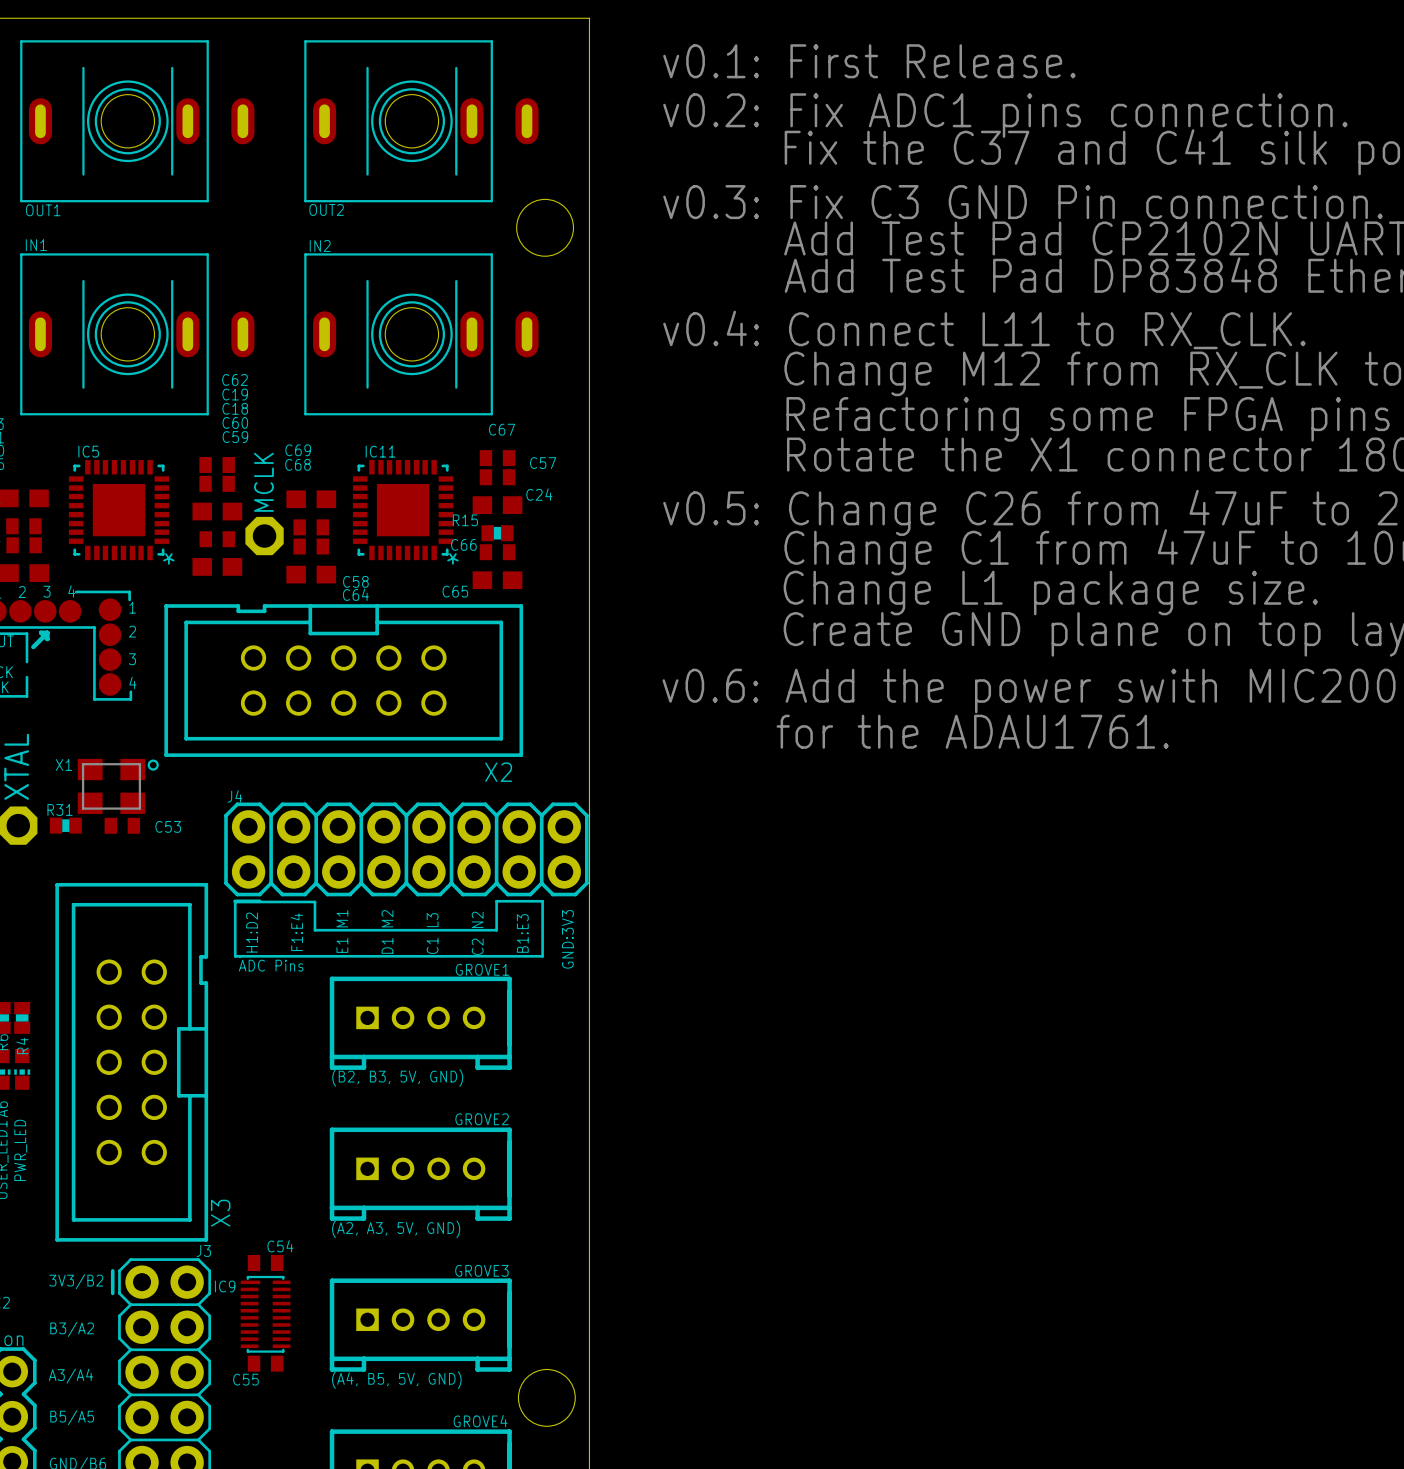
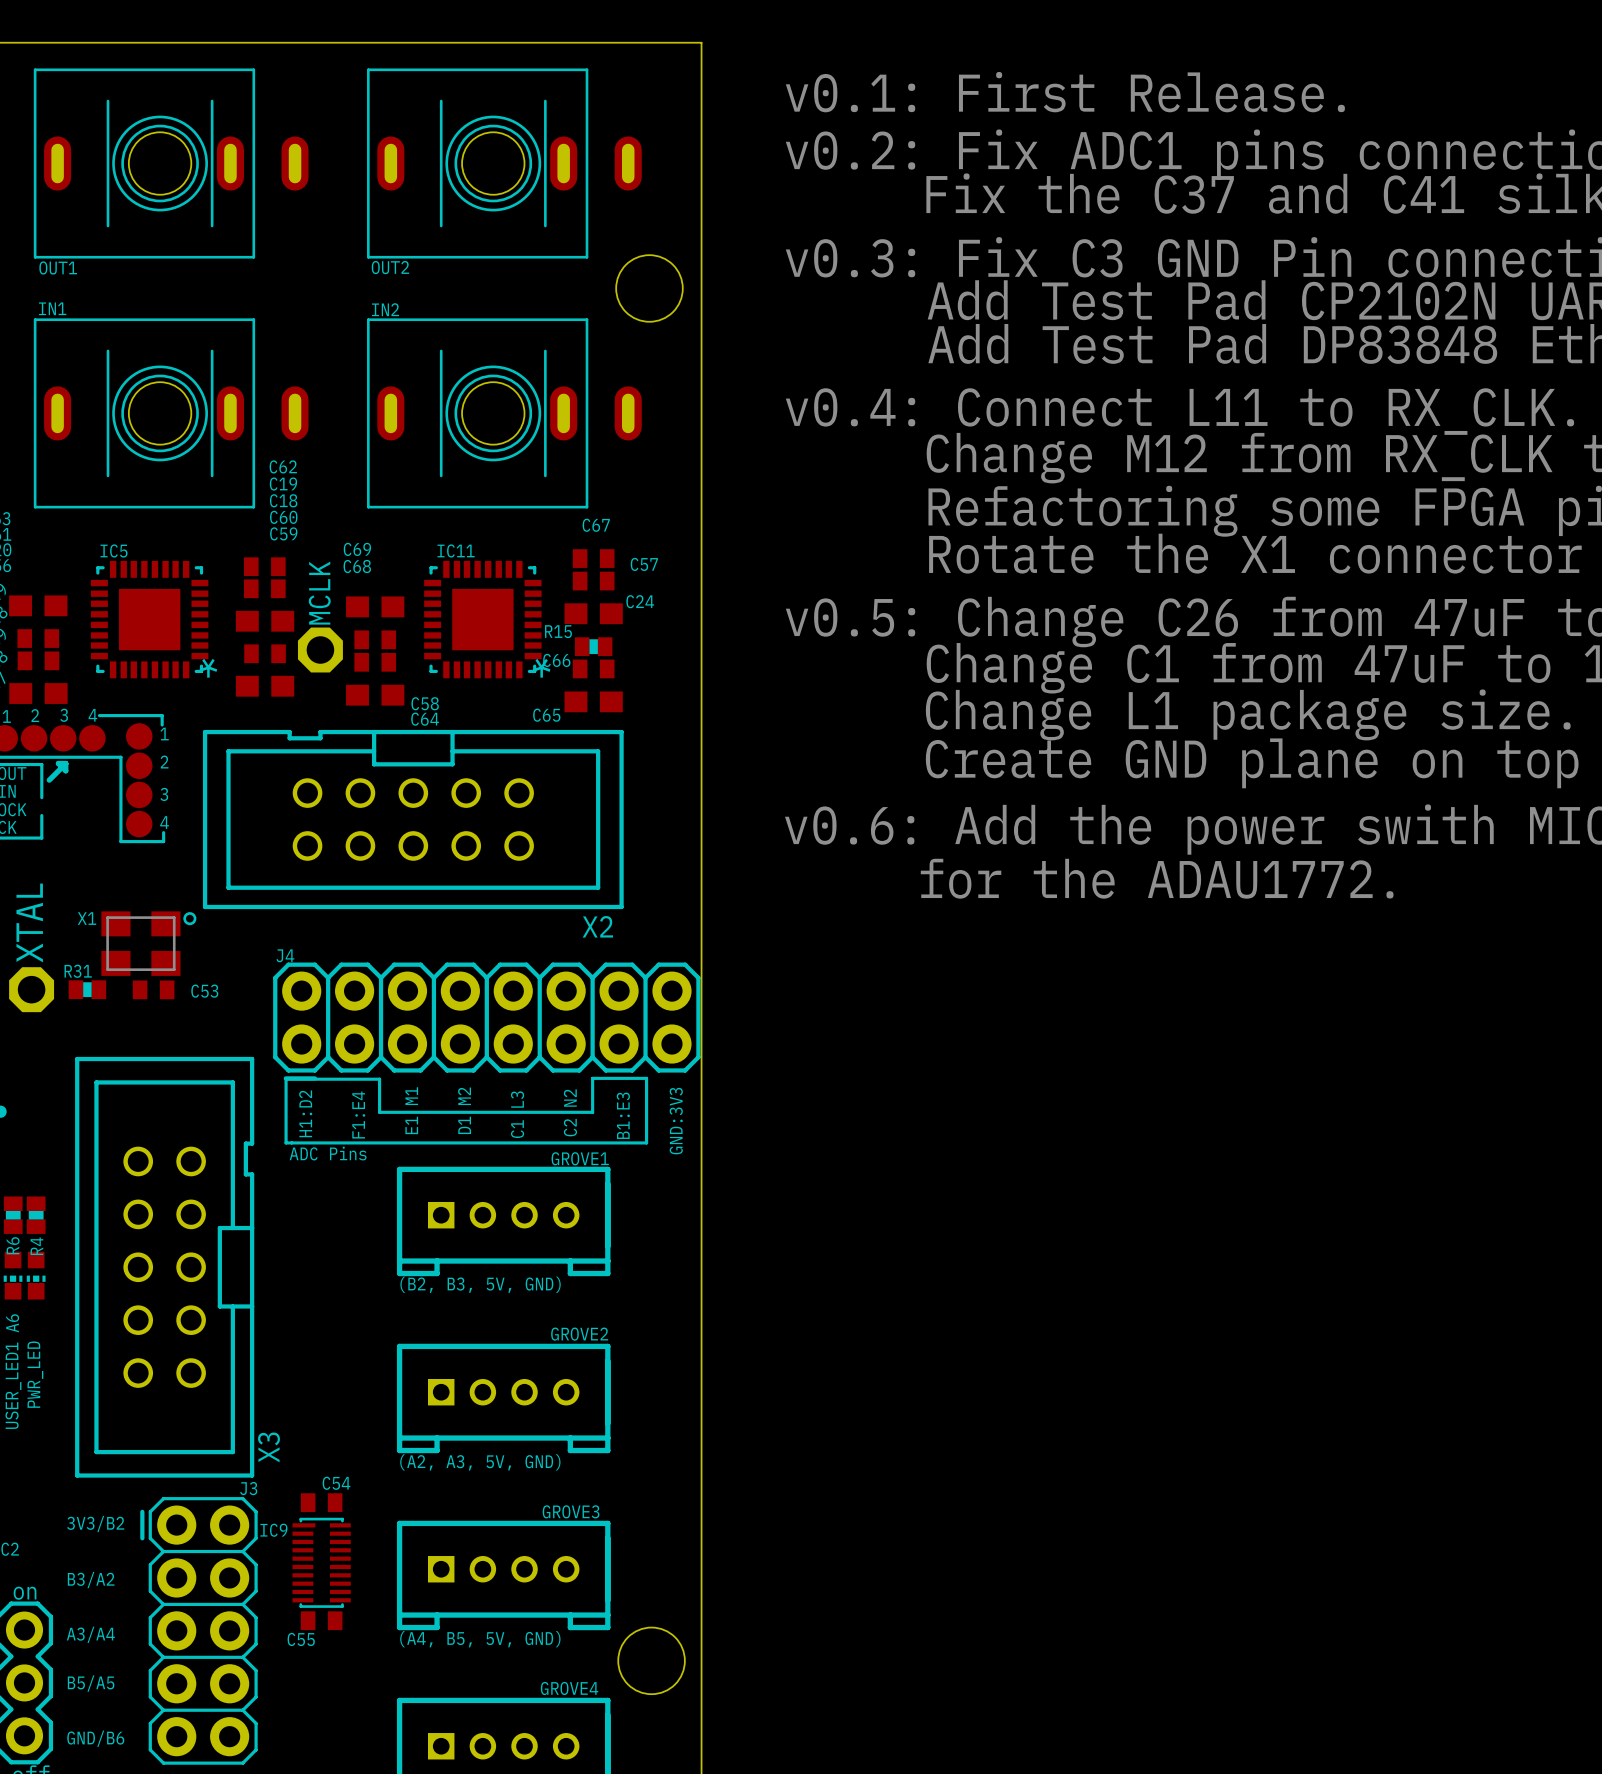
text: for the ADAU1761. (972, 731) -> for the ADAU1772. (1157, 878)

